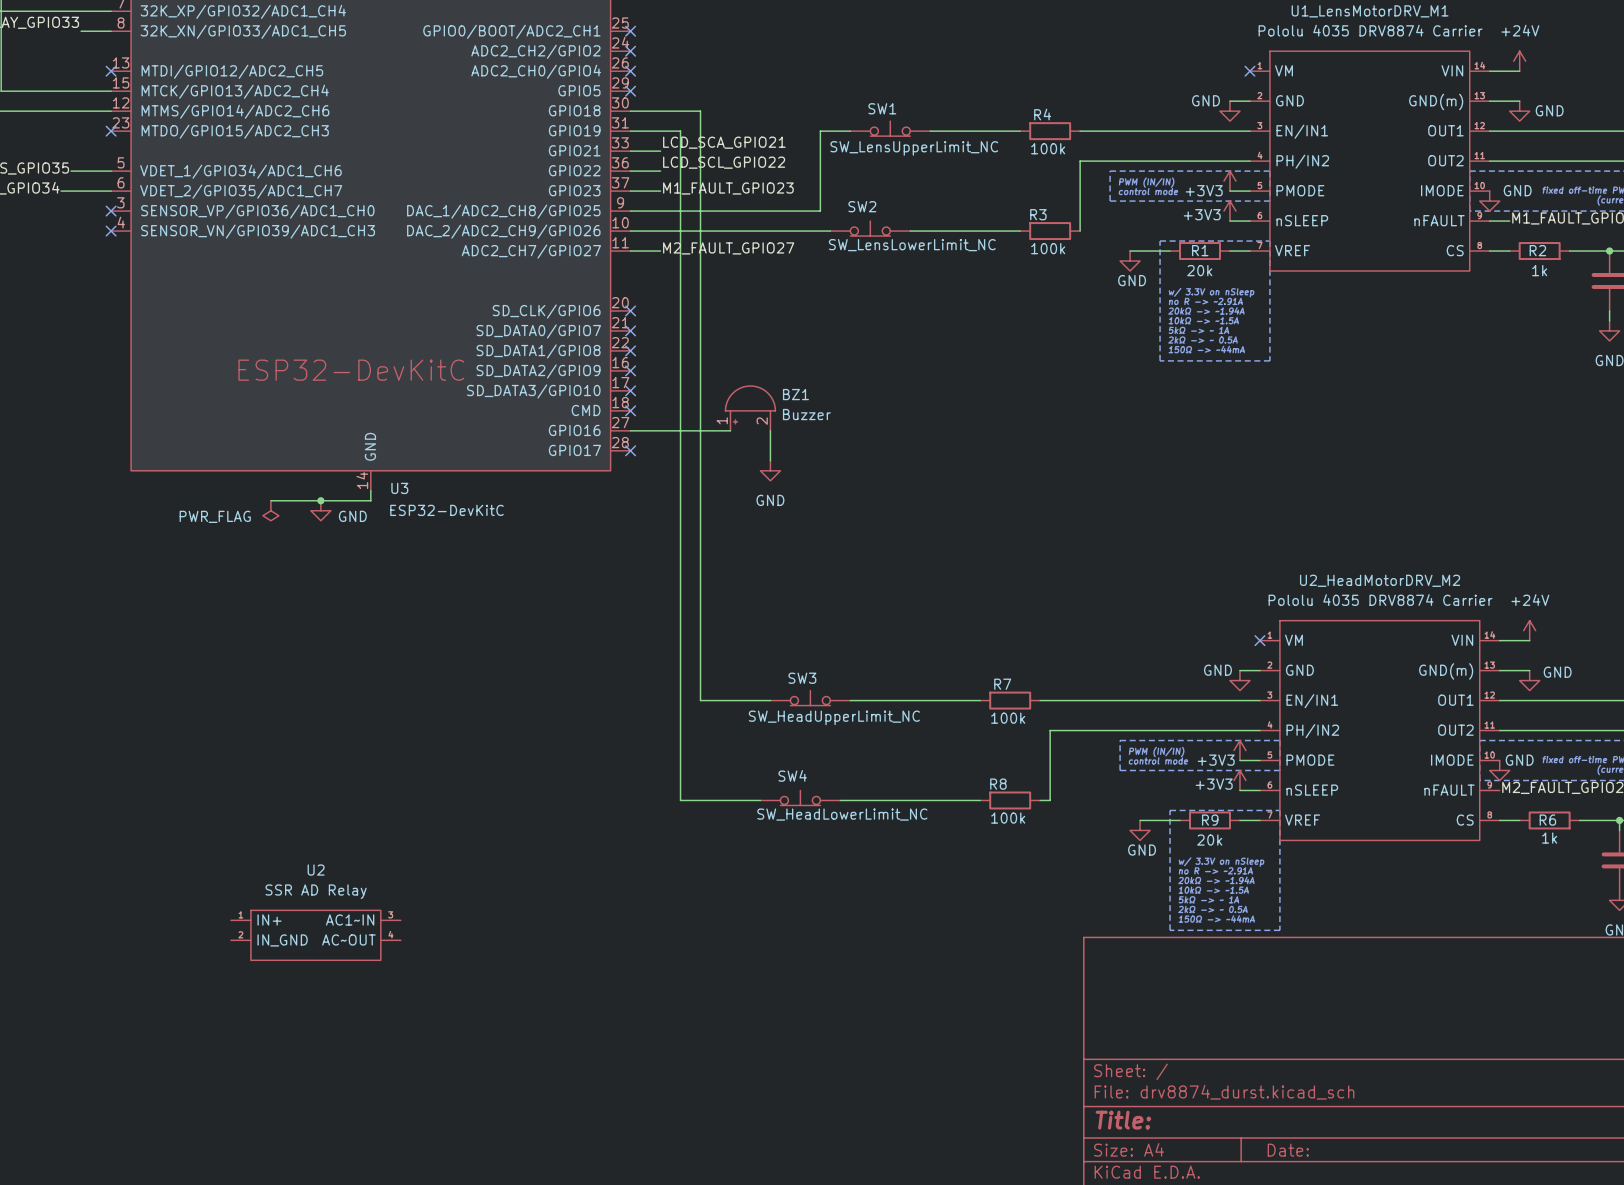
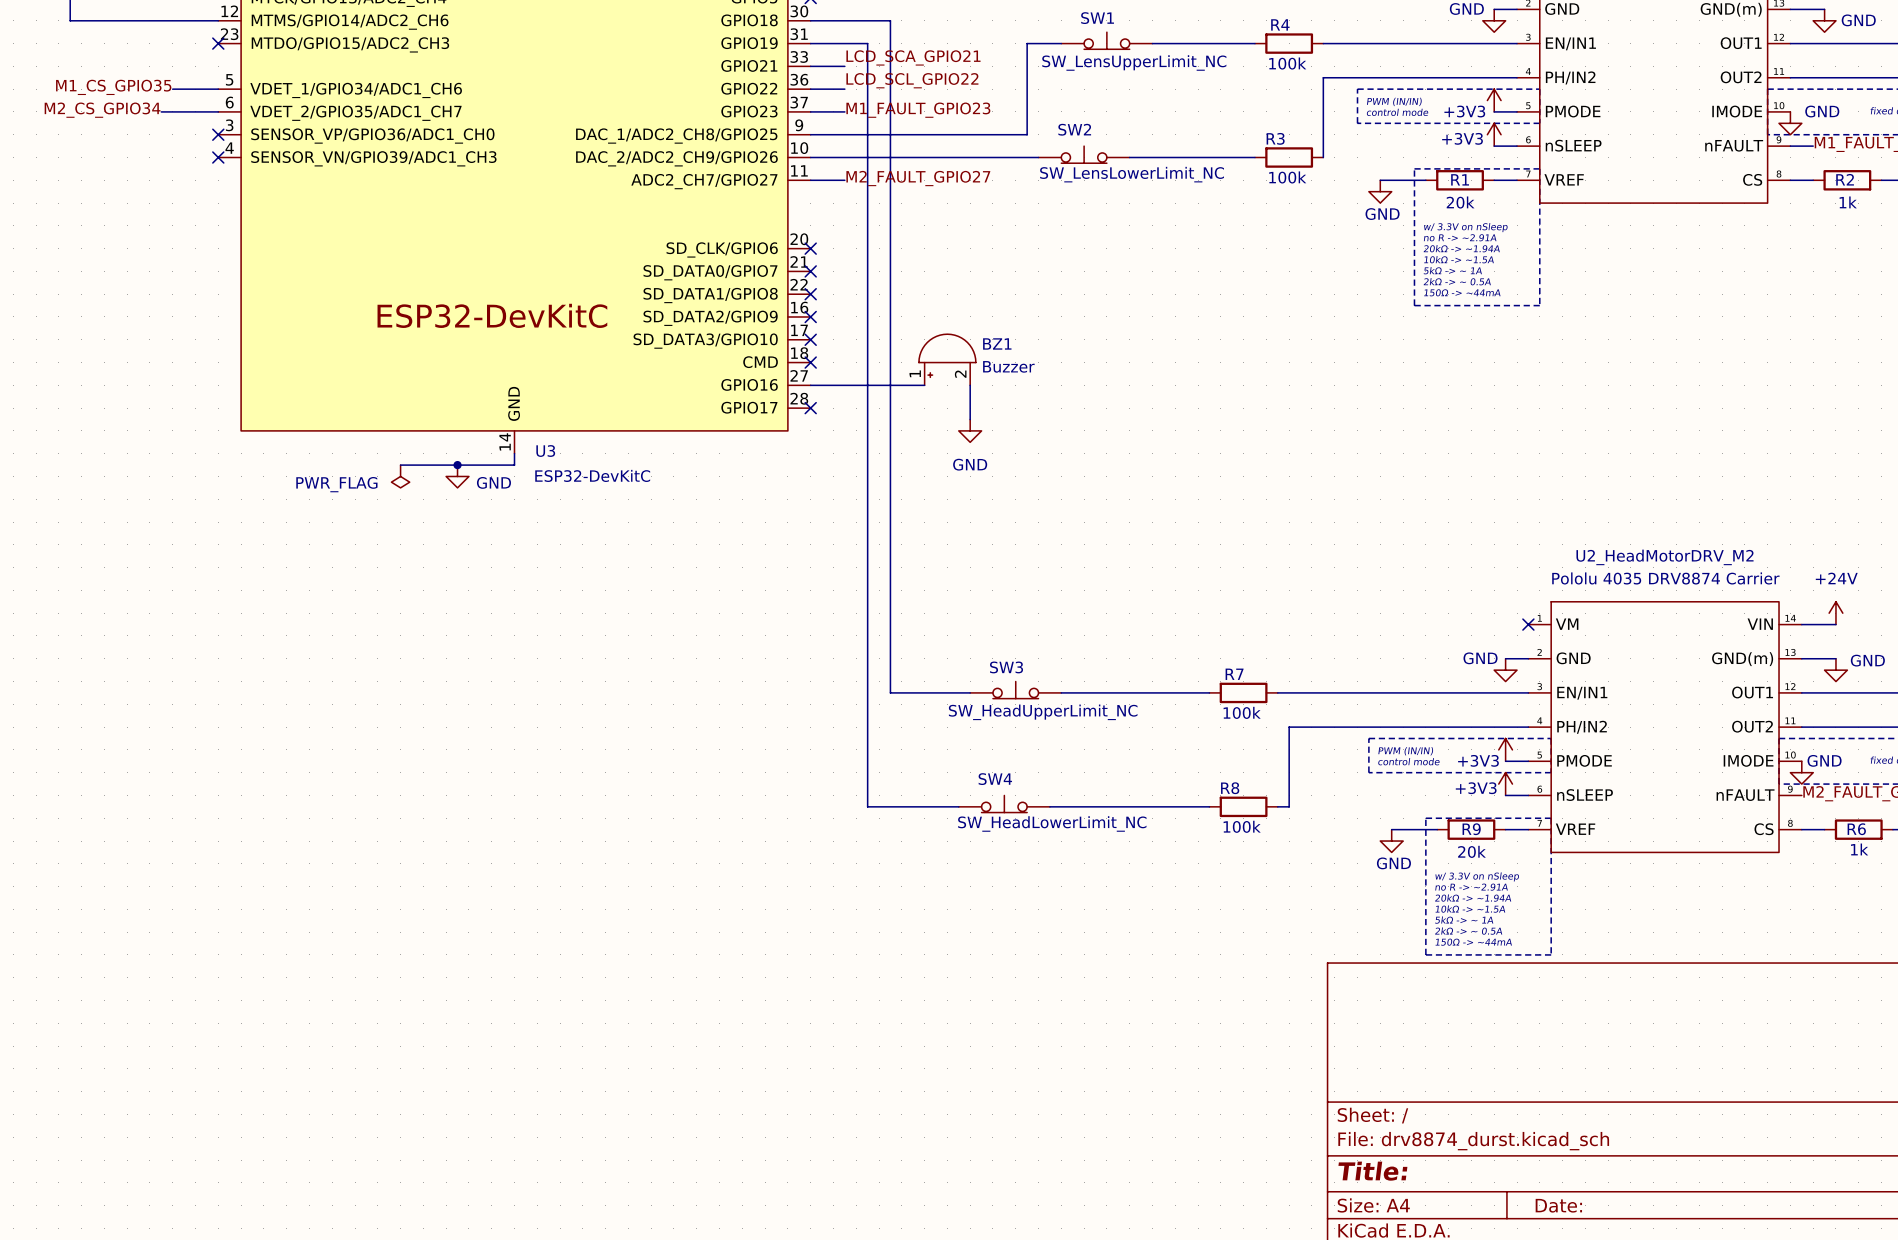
U2: SSR AD Relay (315, 935) -> none

